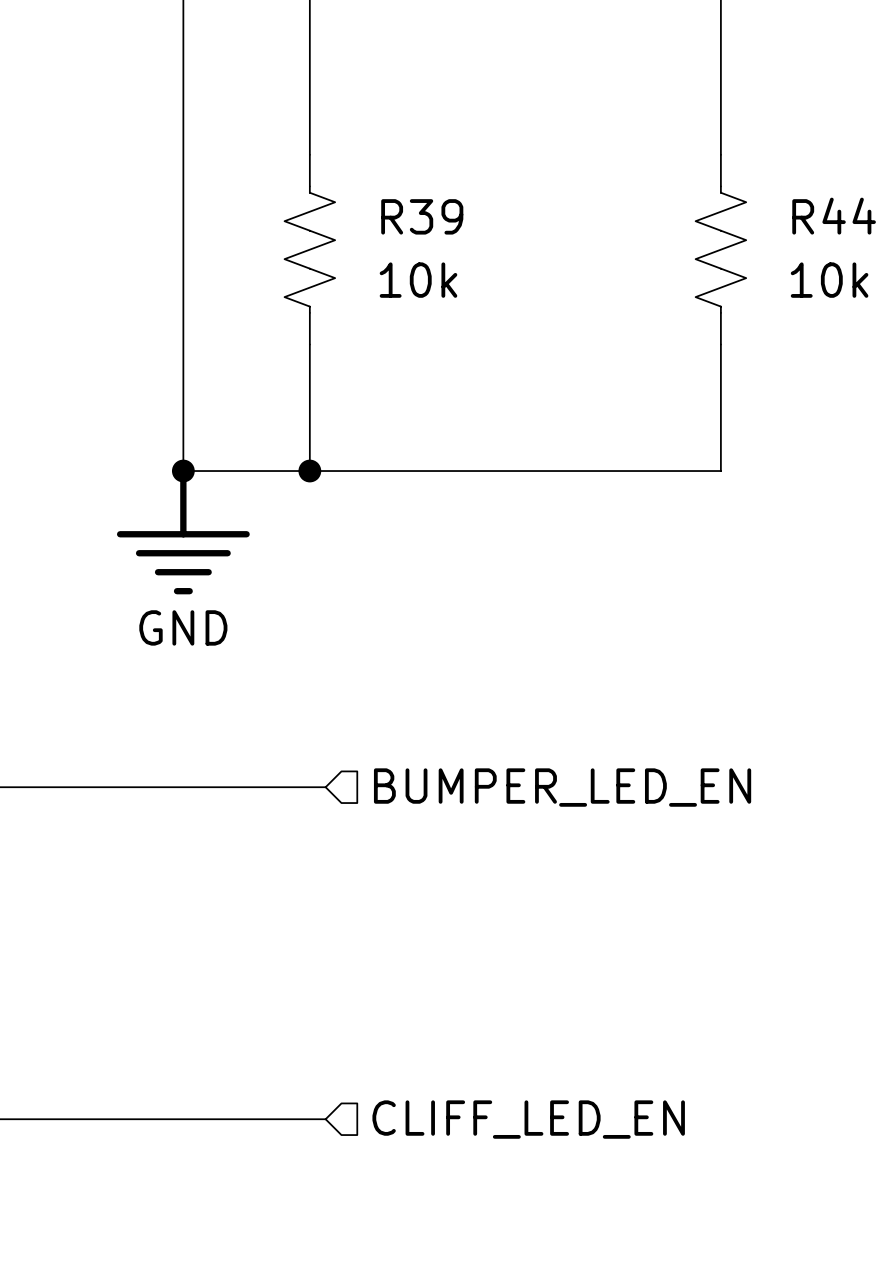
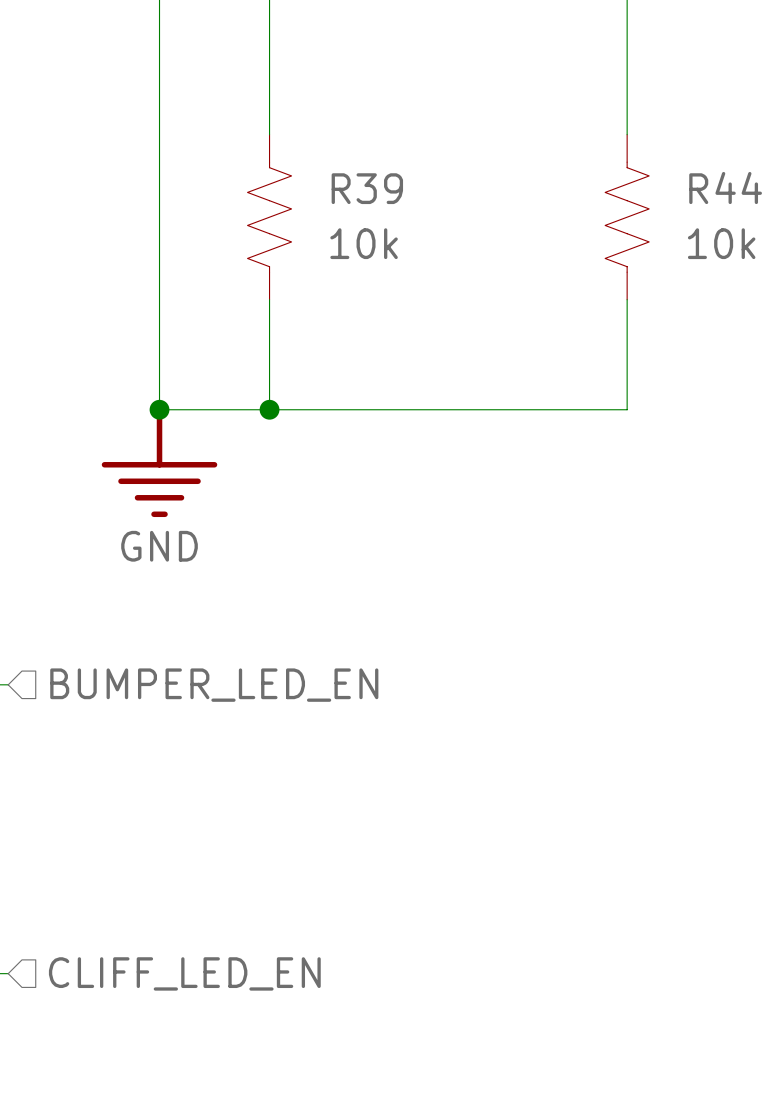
wire: (9, 787) (325, 787) -> none
hierarchical label position: BUMPER_LED_EN (562, 787) -> BUMPER_LED_EN (214, 685)
wire: (9, 1119) (325, 1119) -> none
hierarchical label position: CLIFF_LED_EN (528, 1119) -> CLIFF_LED_EN (184, 973)

